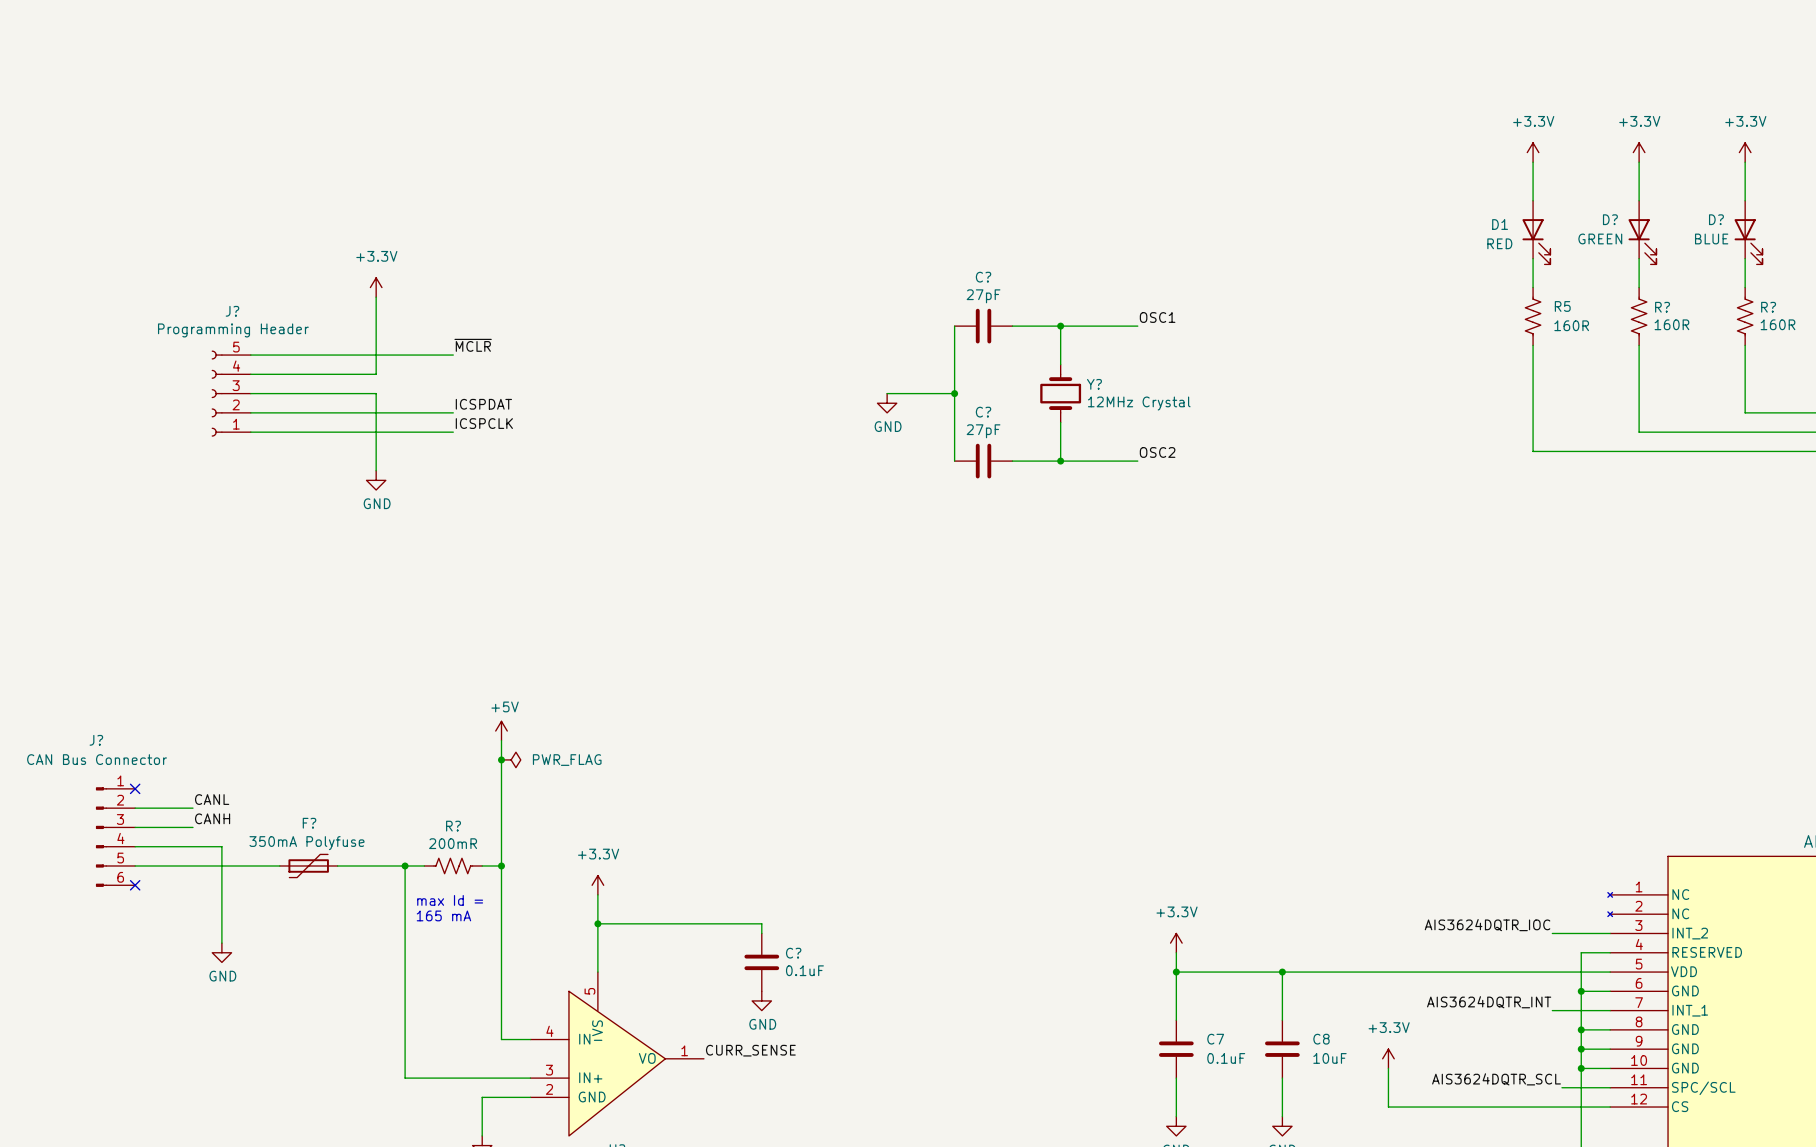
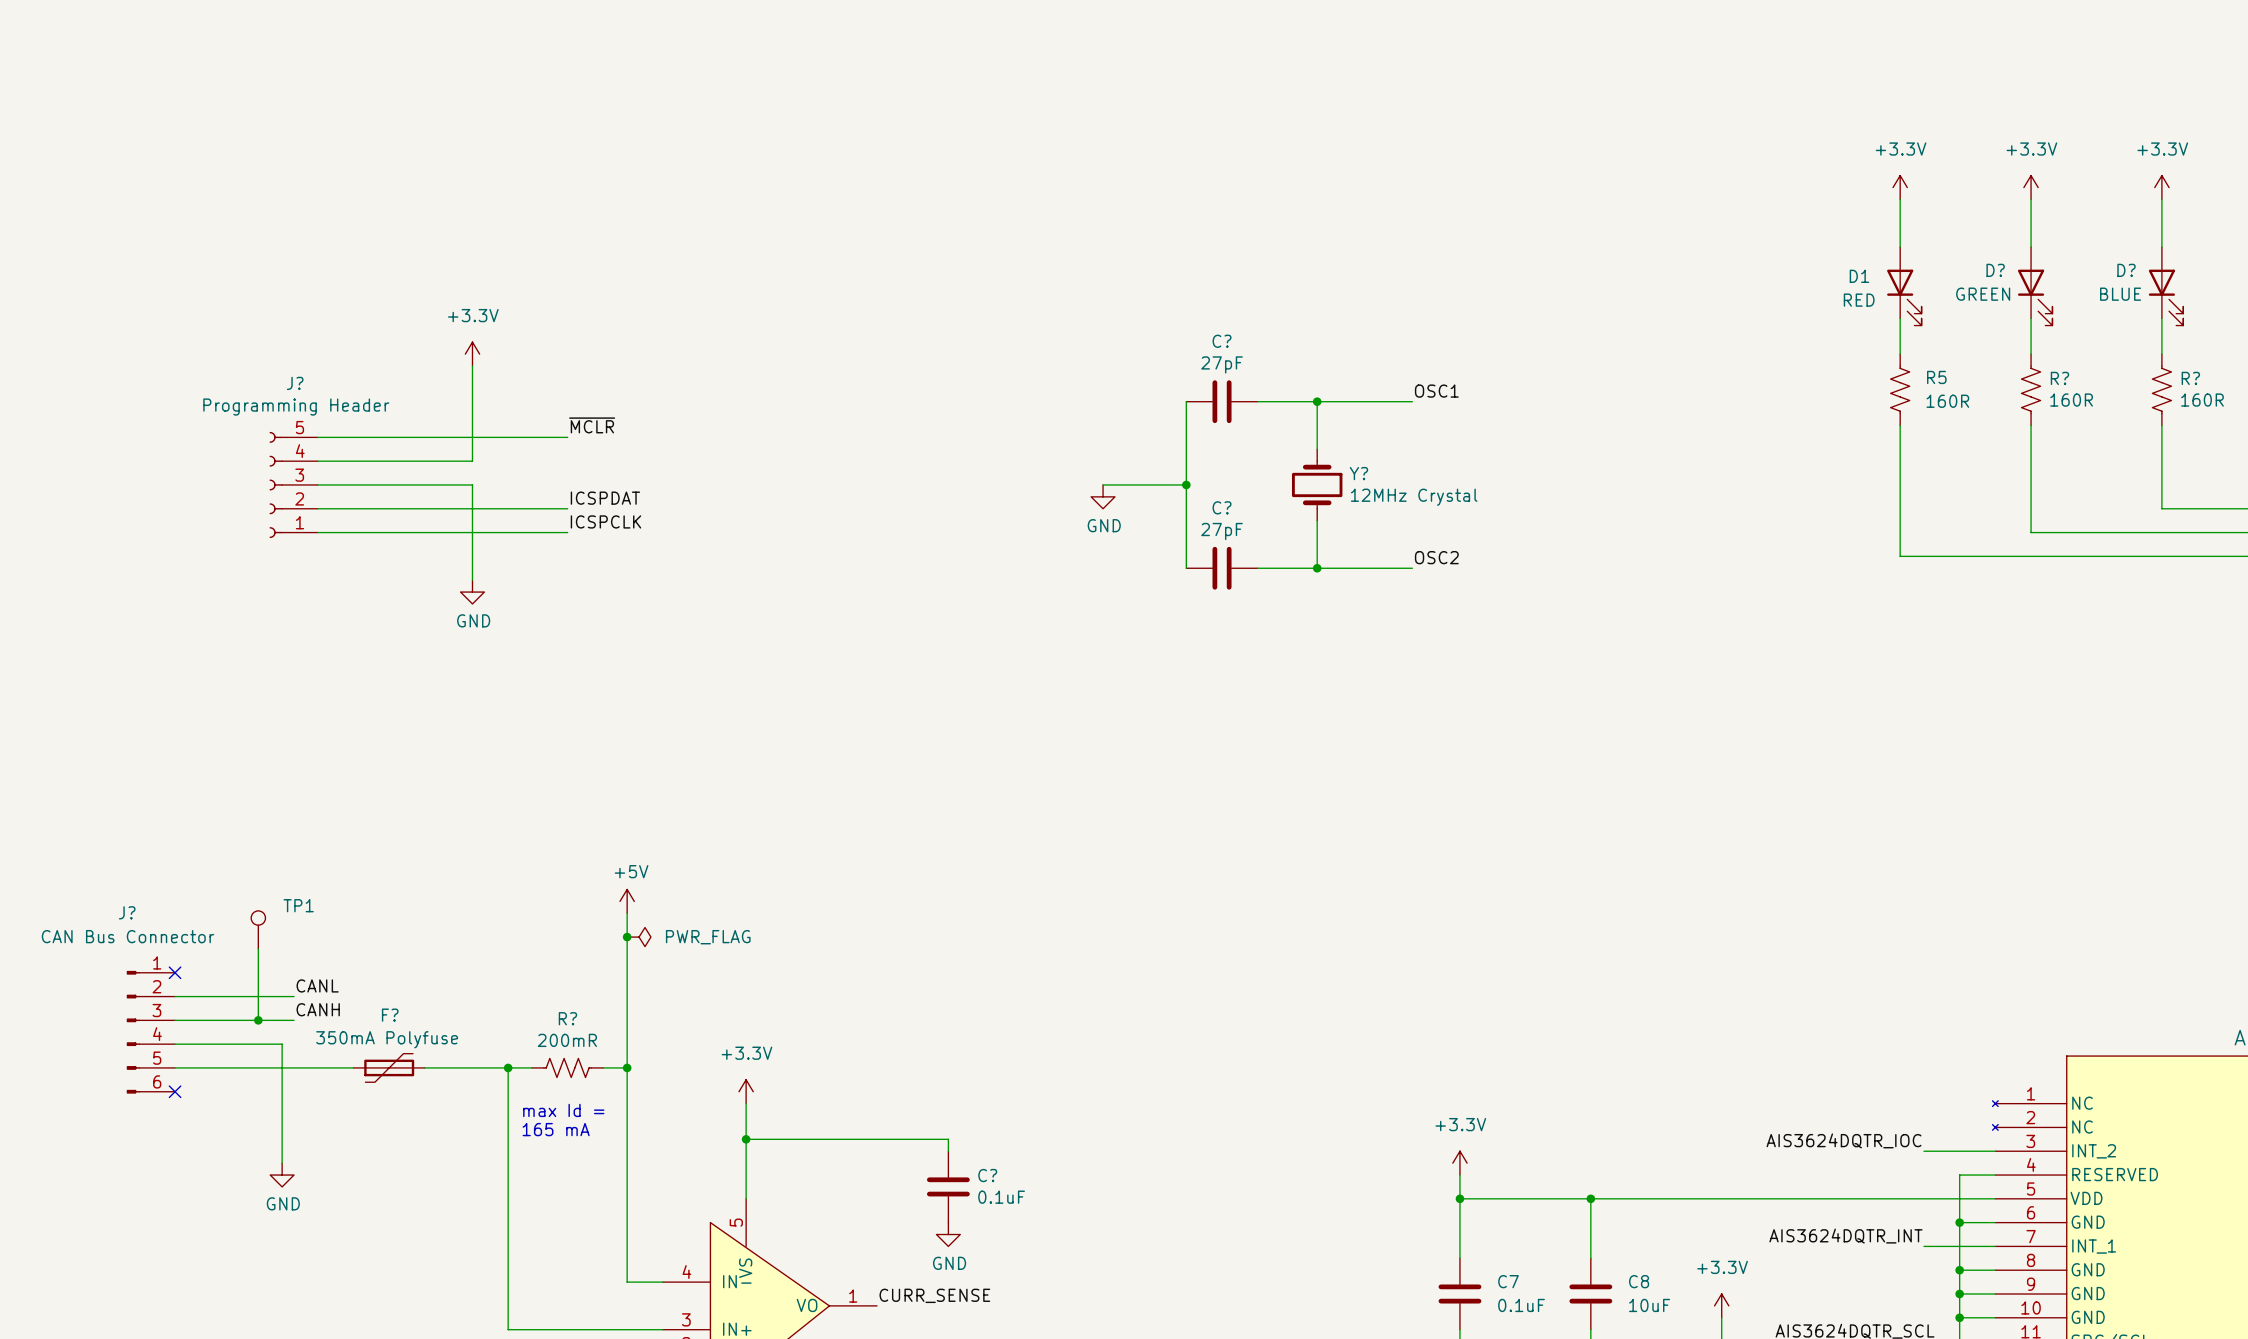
TP1: none -> (258, 929)
wire: none -> (258, 948) (258, 1020)
label position: CANL (212, 799) -> CANL (317, 985)
wire: none -> (246, 996) (294, 996)
label position: CANH (212, 818) -> CANH (318, 1009)
wire: none -> (246, 1020) (294, 1020)
junction: none -> (258, 1020)

